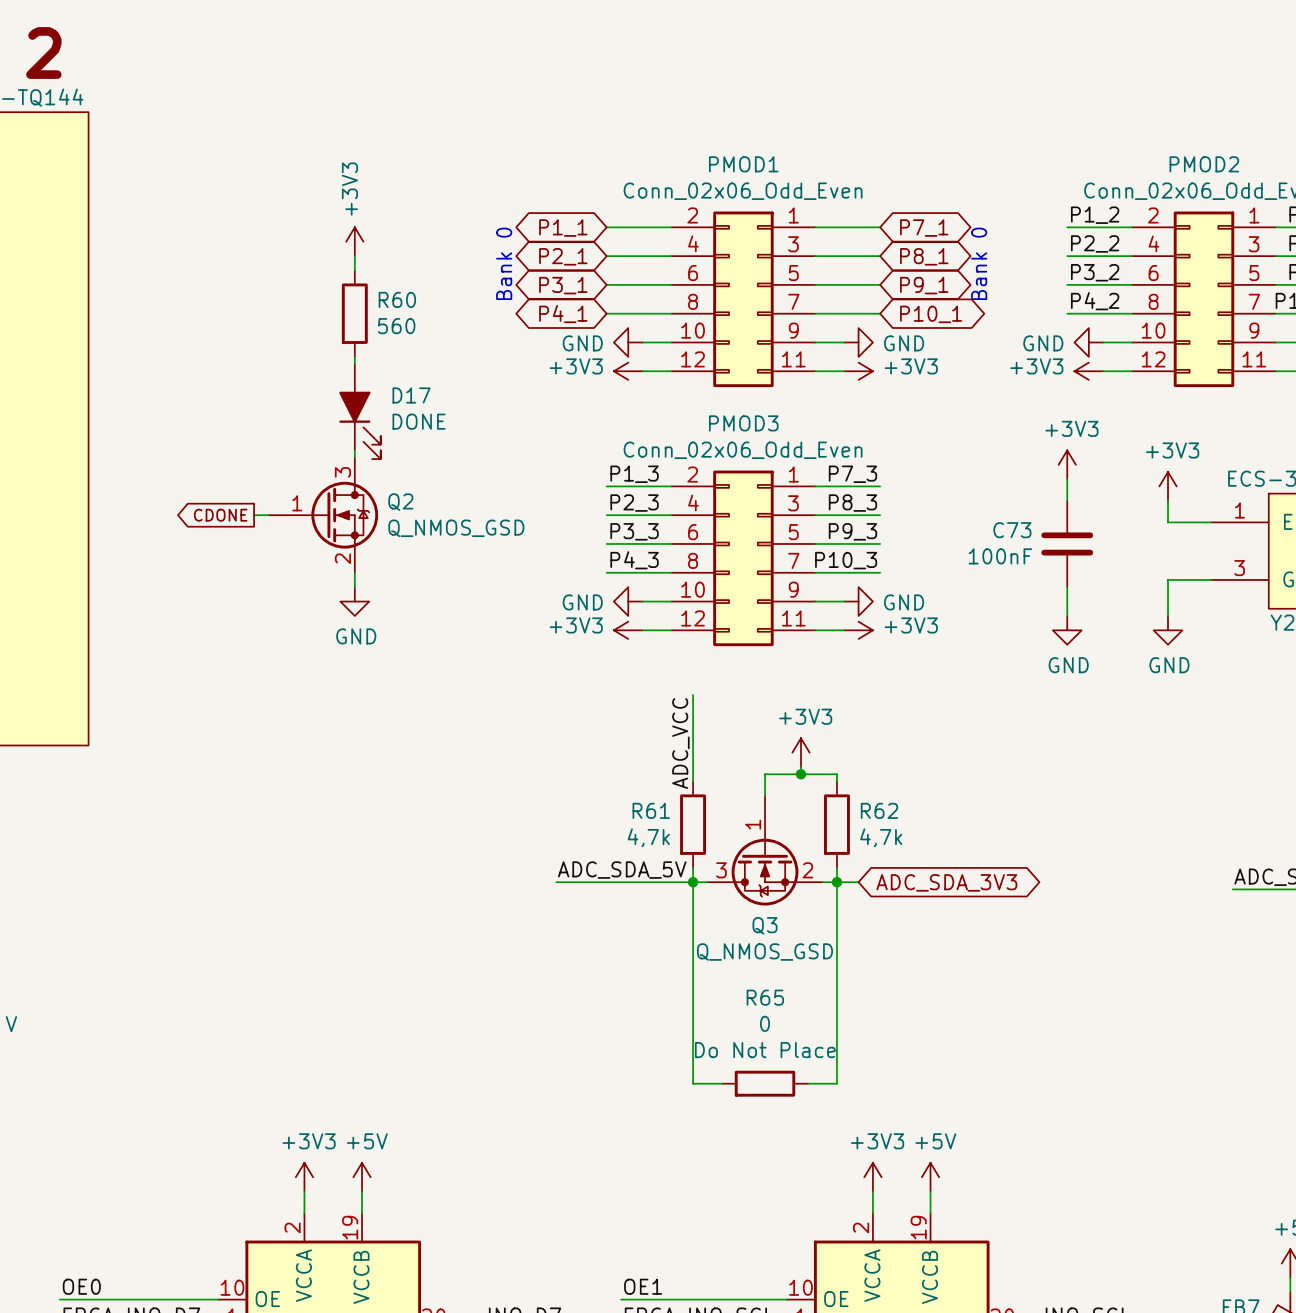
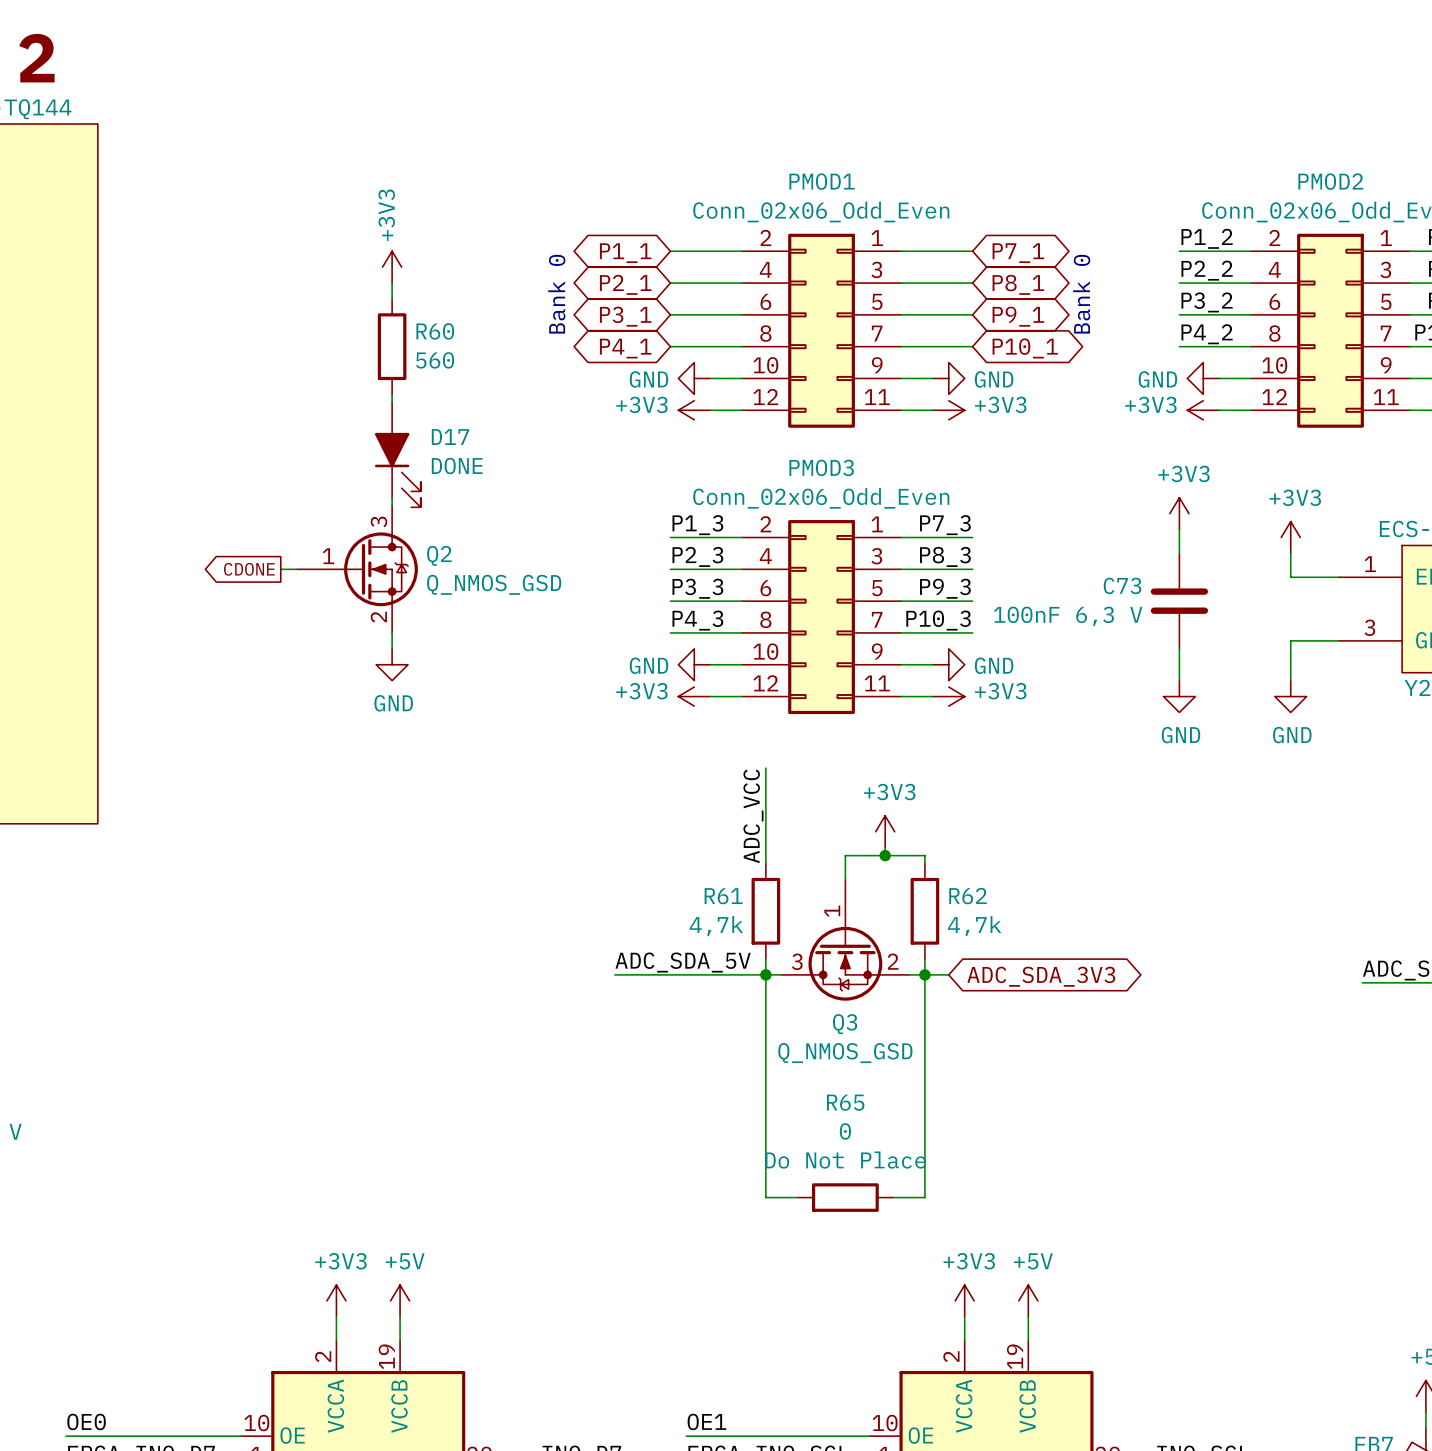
C73 value: 100nF (1000, 556) -> 100nF 6,3 V (1068, 616)

